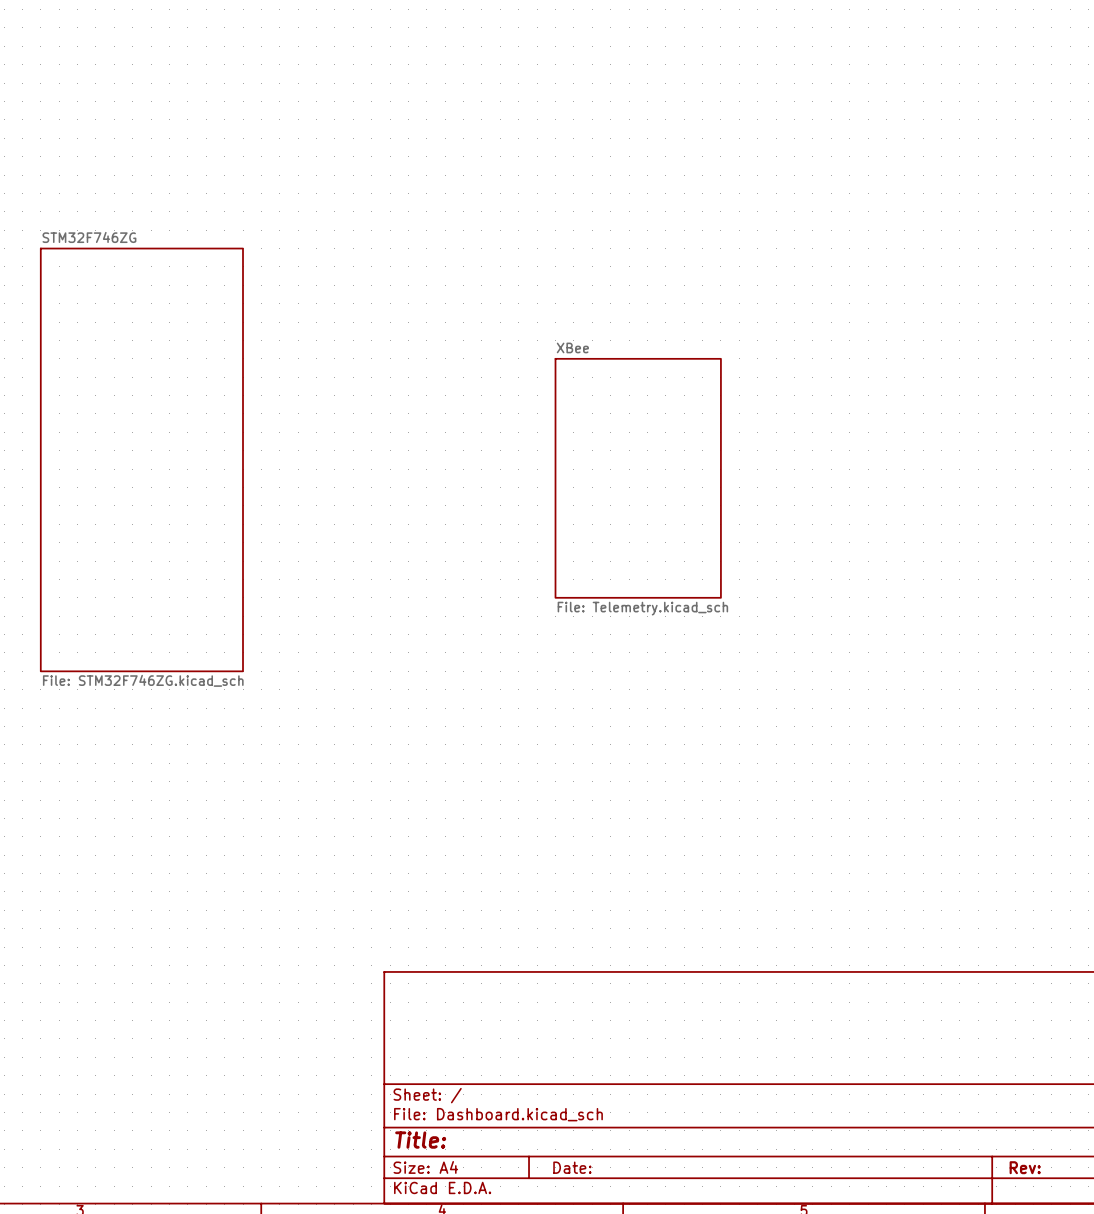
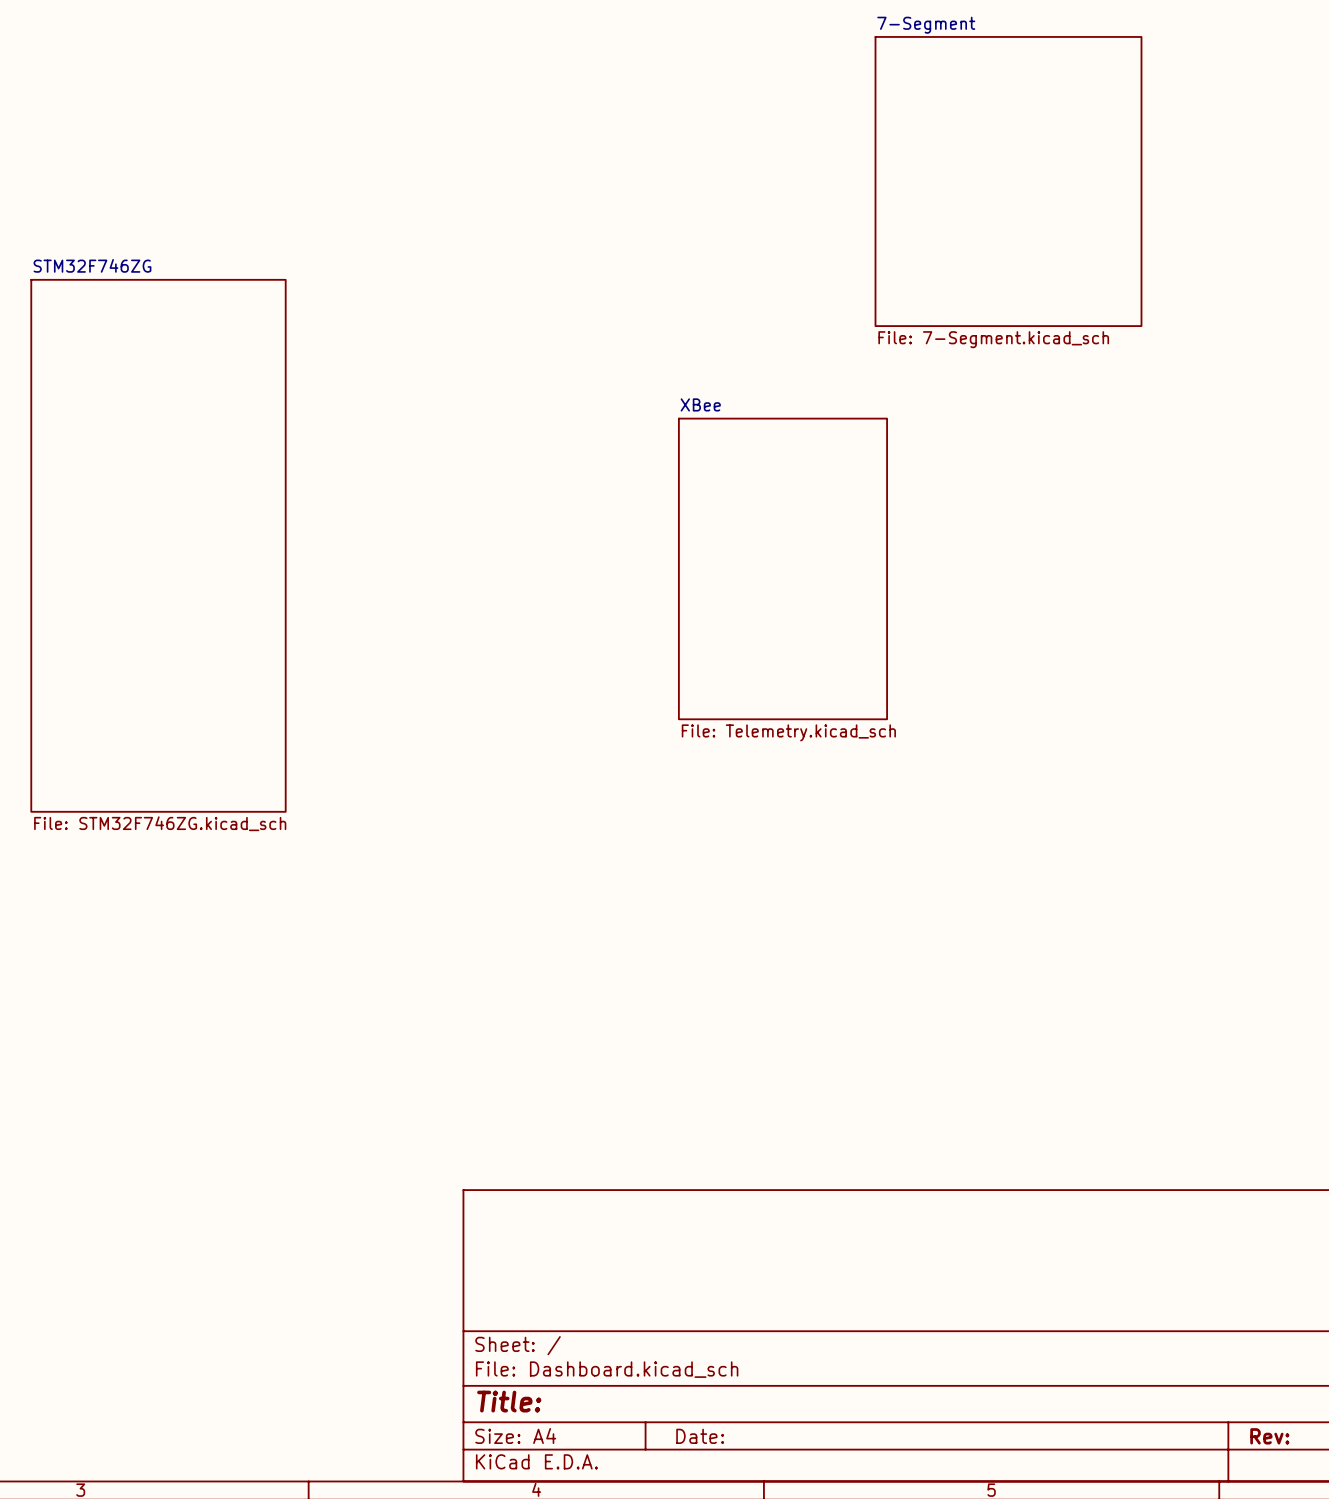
sheet 7-Segment: none -> File: 7-Segment.kicad_sch (1008, 181)

